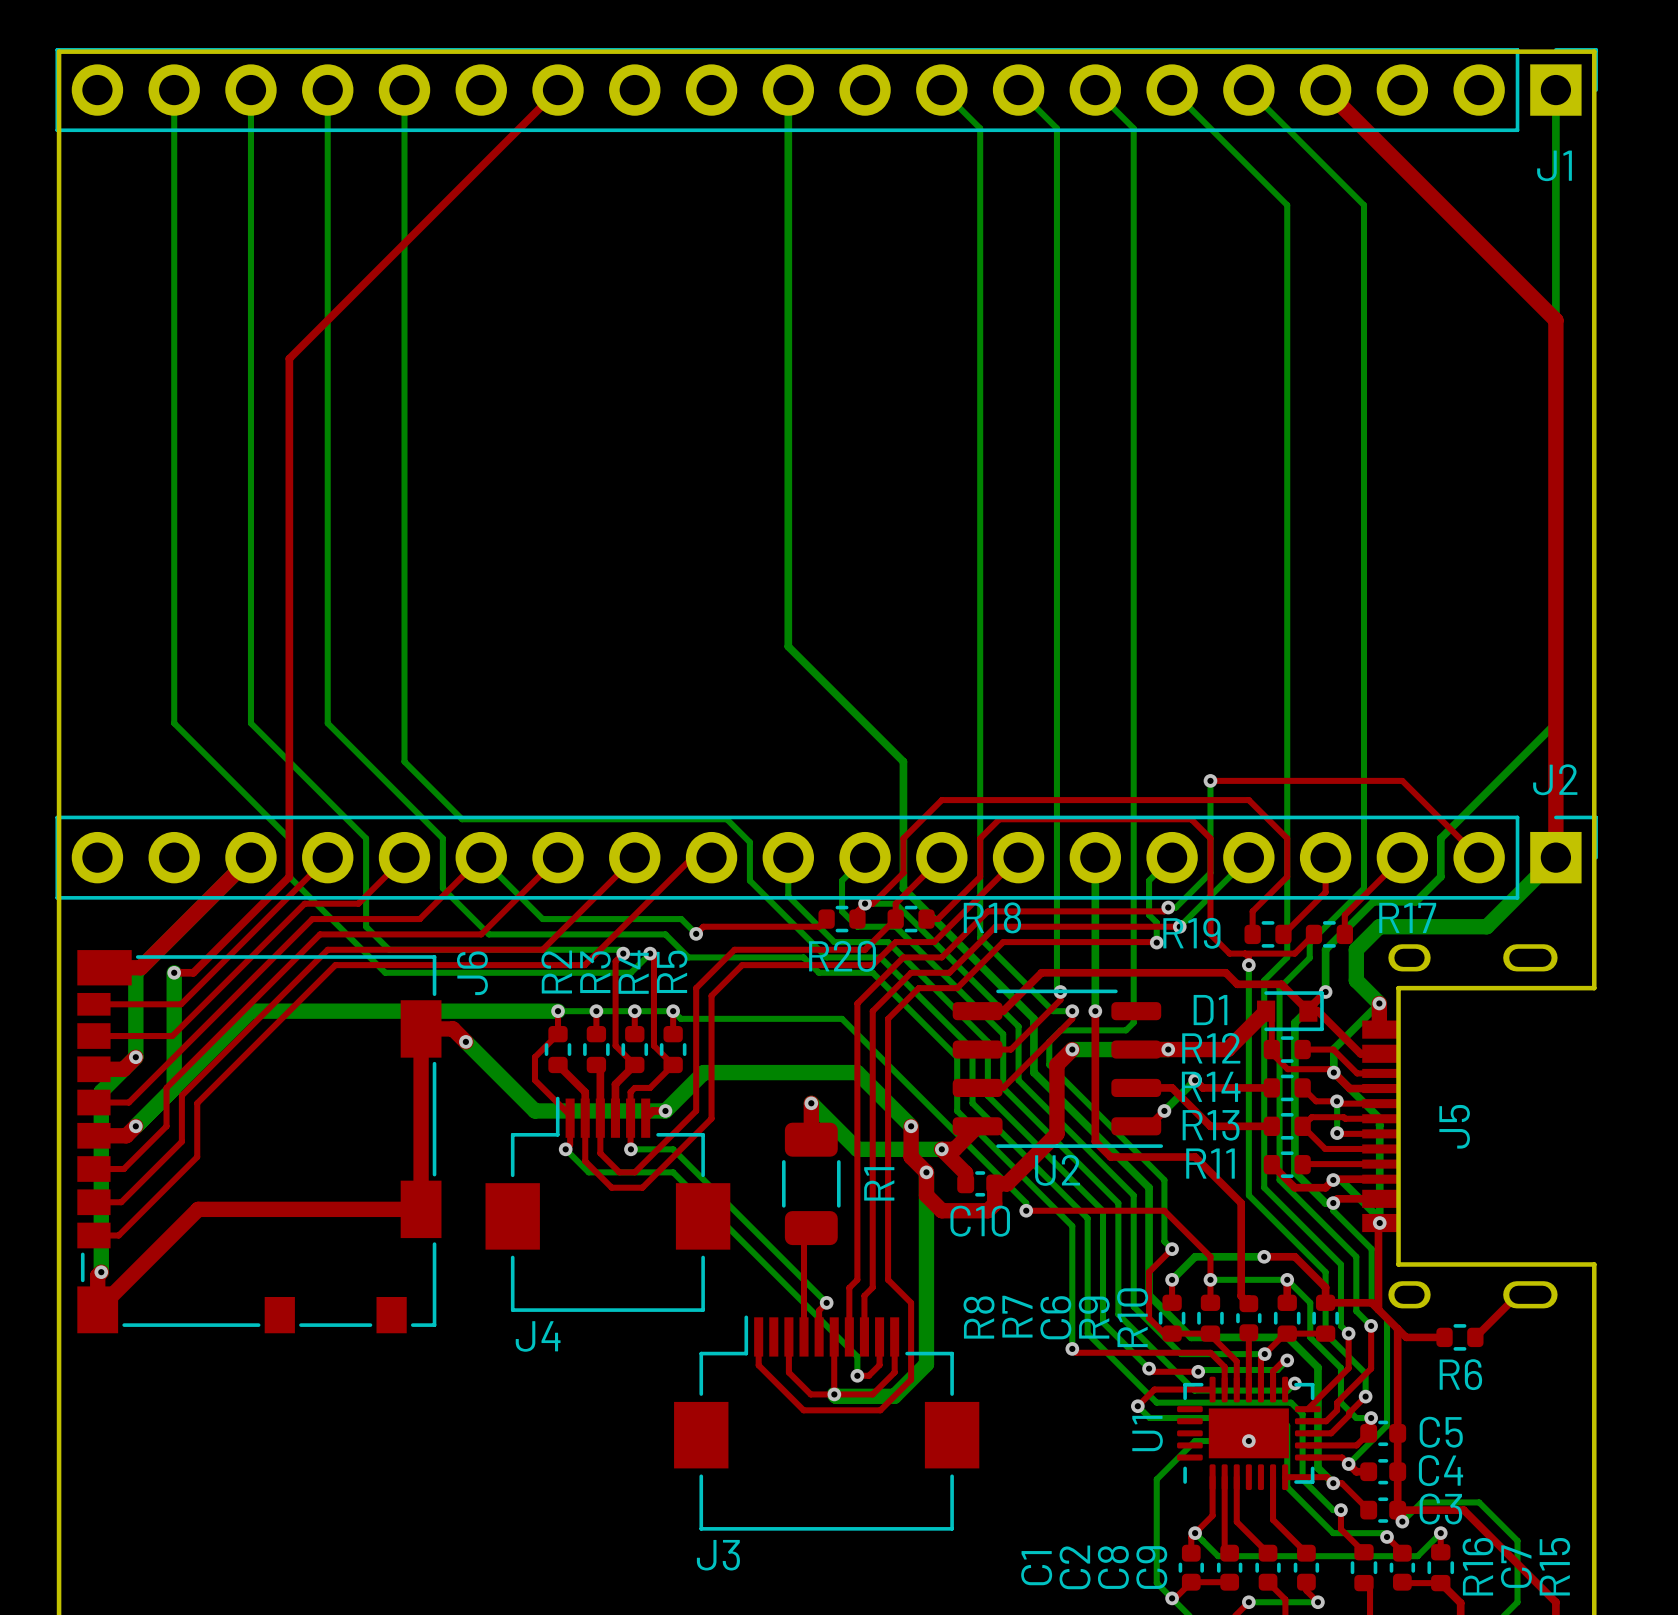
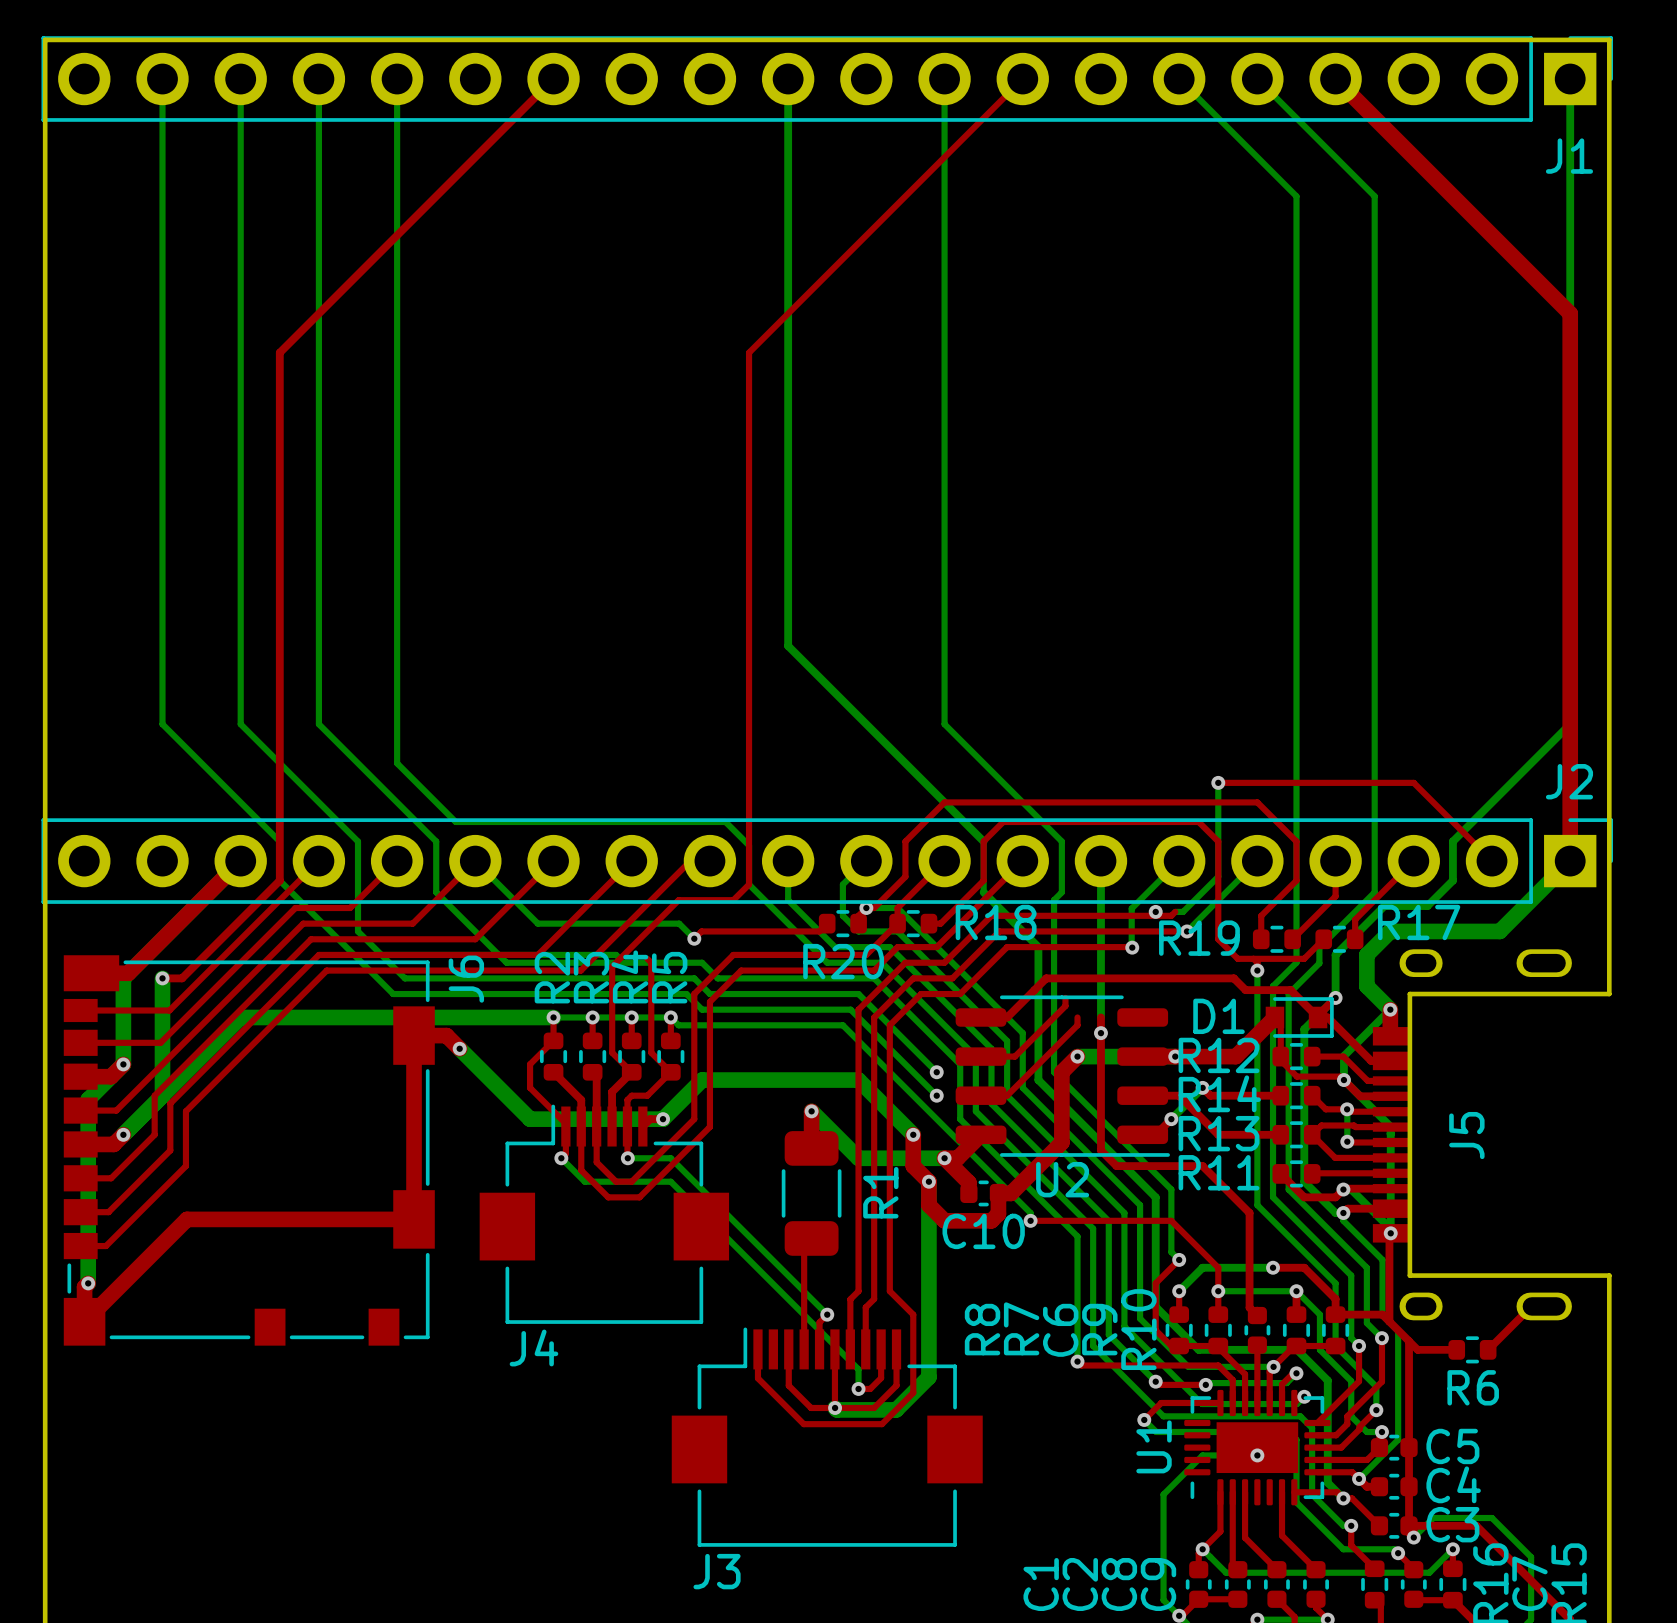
bottom track: (941, 90) (980, 128) (980, 838) -> (944, 79) (944, 724) (1061, 841)
top track: none -> (1022, 79) (749, 352) (749, 884) (733, 900) (678, 900) (620, 958)
bottom track: (1018, 90) (1056, 128) (1056, 838) -> none
bottom track: (1095, 90) (1133, 128) (1133, 1022) (1126, 1030) (1060, 1030) (1049, 1041) -> none
bottom track: (903, 761) (903, 888) (1033, 1018) -> (905, 763) (983, 841)
bottom track: (1149, 880) (1149, 914) (1156, 922) (1156, 942) -> (1155, 884) (1131, 908) (1132, 947)
bottom track: (980, 888) (980, 938) (1053, 1011) (1072, 1011) -> (983, 892) (1038, 947) (1038, 1025)
bottom track: (1056, 888) (1056, 988) (1060, 991) -> (1061, 892) (1054, 900) (1054, 1048)
via: none -> (1155, 911)
via: (1168, 907) -> none
bottom track: (488, 934) (665, 934) (688, 957) -> (483, 939) (506, 962) (686, 962)
top track: (1126, 942) (1156, 942) -> none
via: none -> (1132, 947)
via: (1156, 942) -> none
via: (623, 953) -> none
bottom track: (650, 953) (630, 972) -> (936, 1072) (858, 994) (709, 994) (694, 978) (627, 978)
via: (650, 953) -> none
bottom track: (703, 957) (803, 957) (818, 972) -> (702, 962) (717, 978) (819, 978)
bottom track: (385, 972) (412, 972) -> (381, 954) (404, 978)
bottom track: none -> (377, 978) (393, 994) (686, 994) (702, 1009) (850, 1009) (936, 1095)
via: (1060, 991) -> none
via: (1072, 1011) -> none
via: (1095, 1011) -> none
via: none -> (1100, 1033)
via: none -> (936, 1072)
via: none -> (936, 1095)

